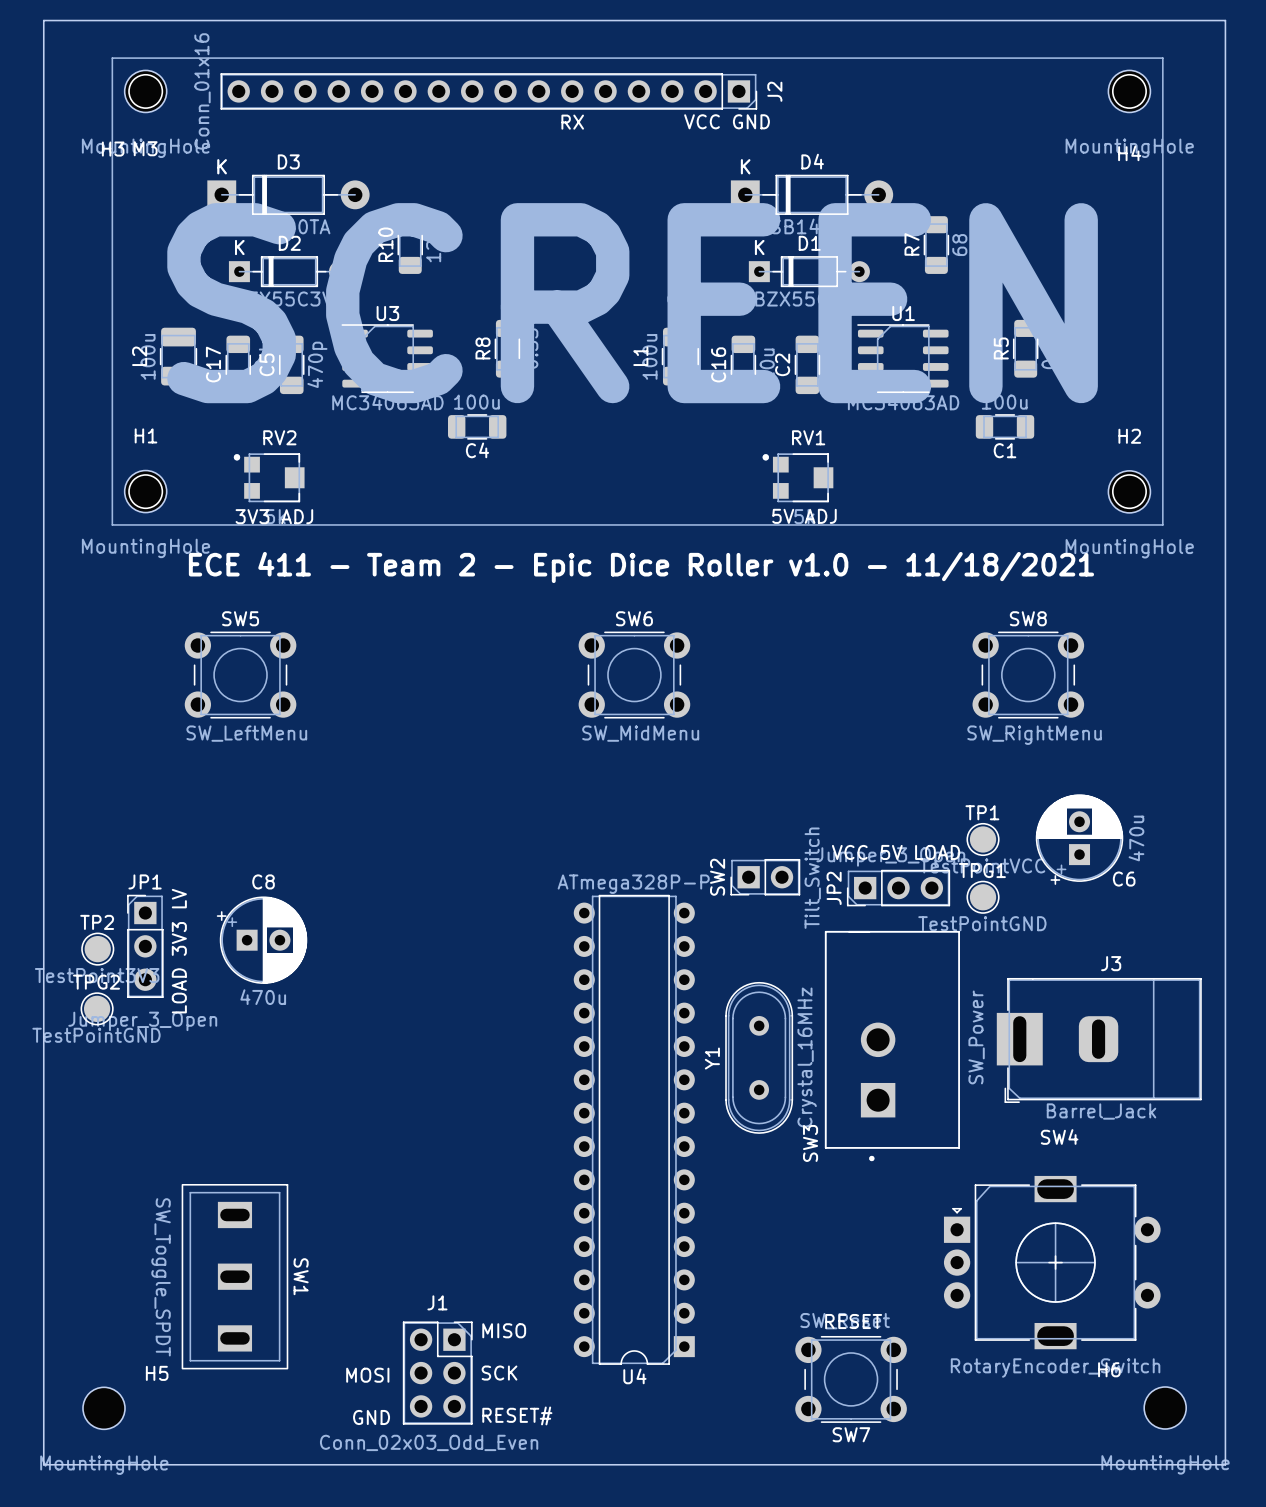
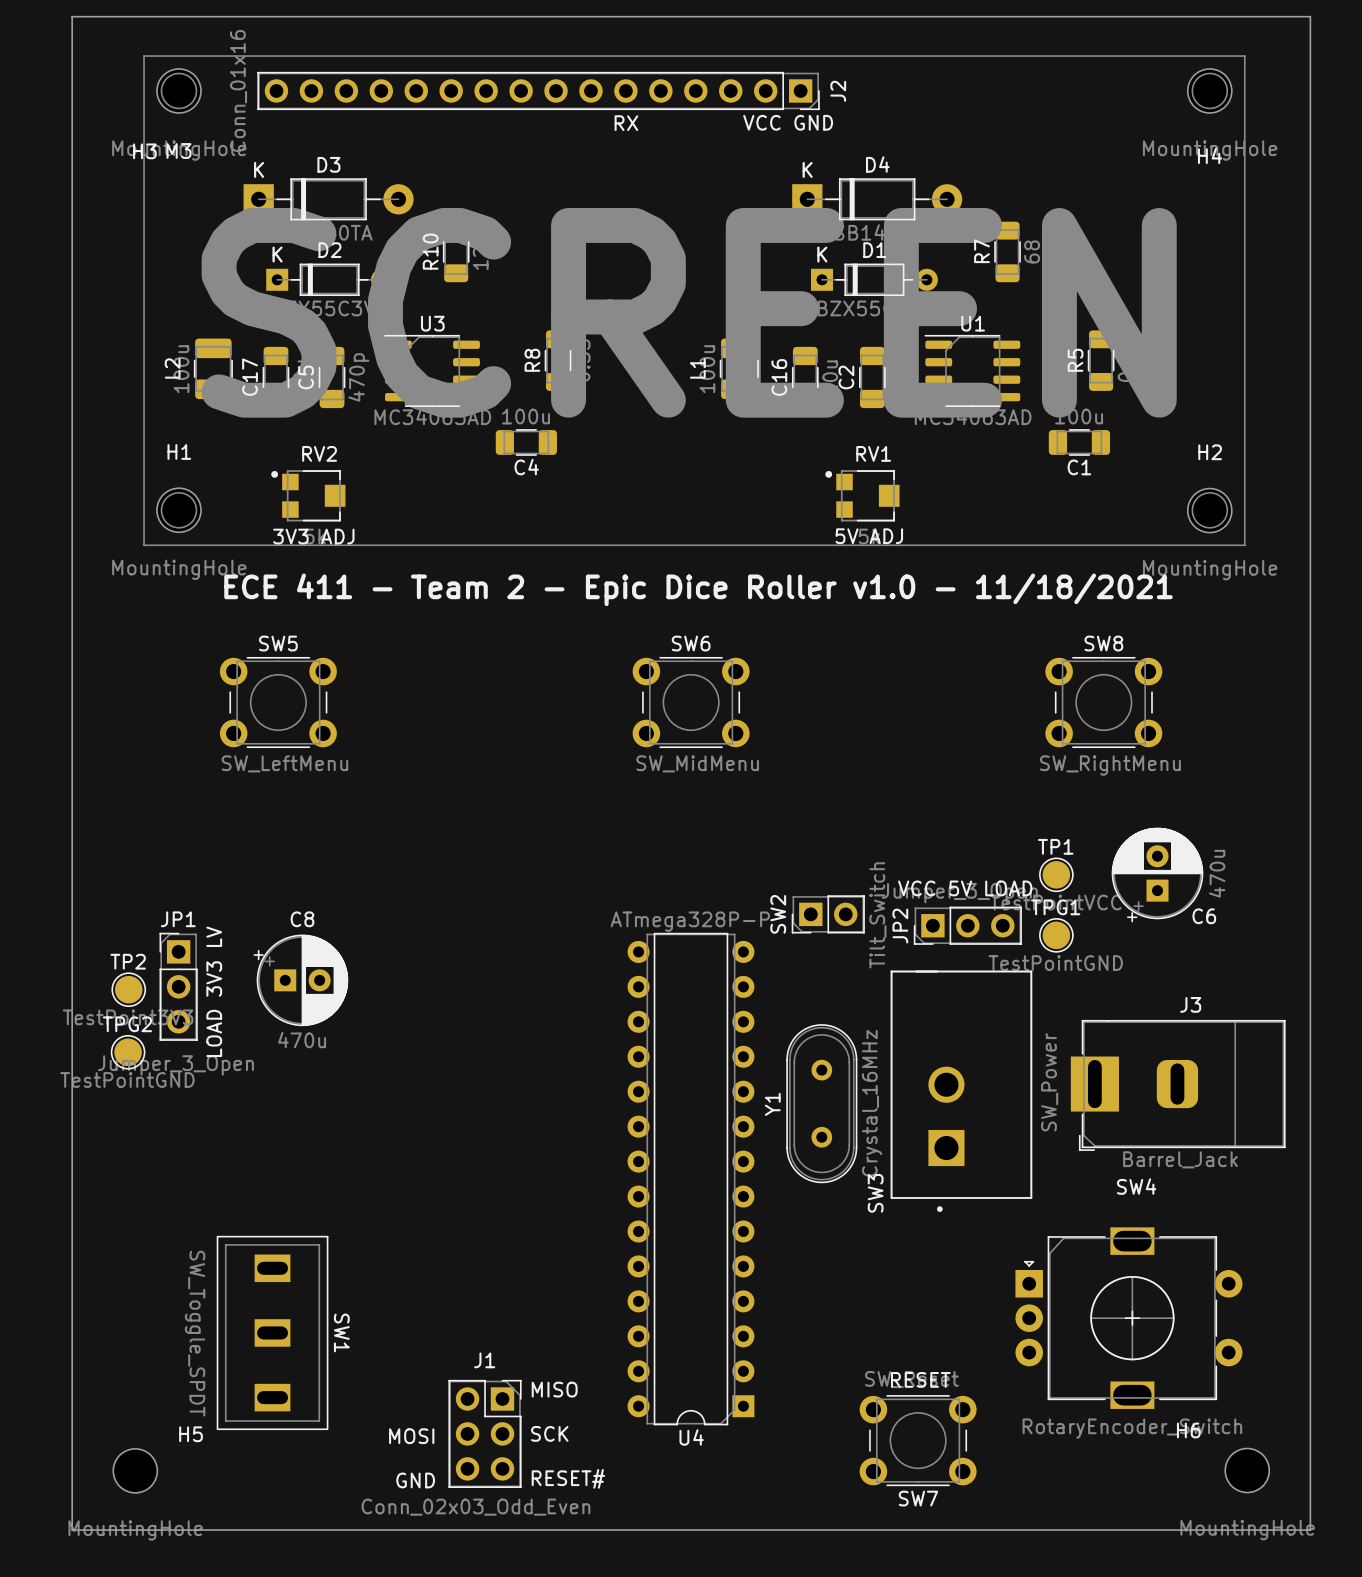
J2 footprint: [111, 57, 1164, 526] -> [143, 55, 1246, 547]

